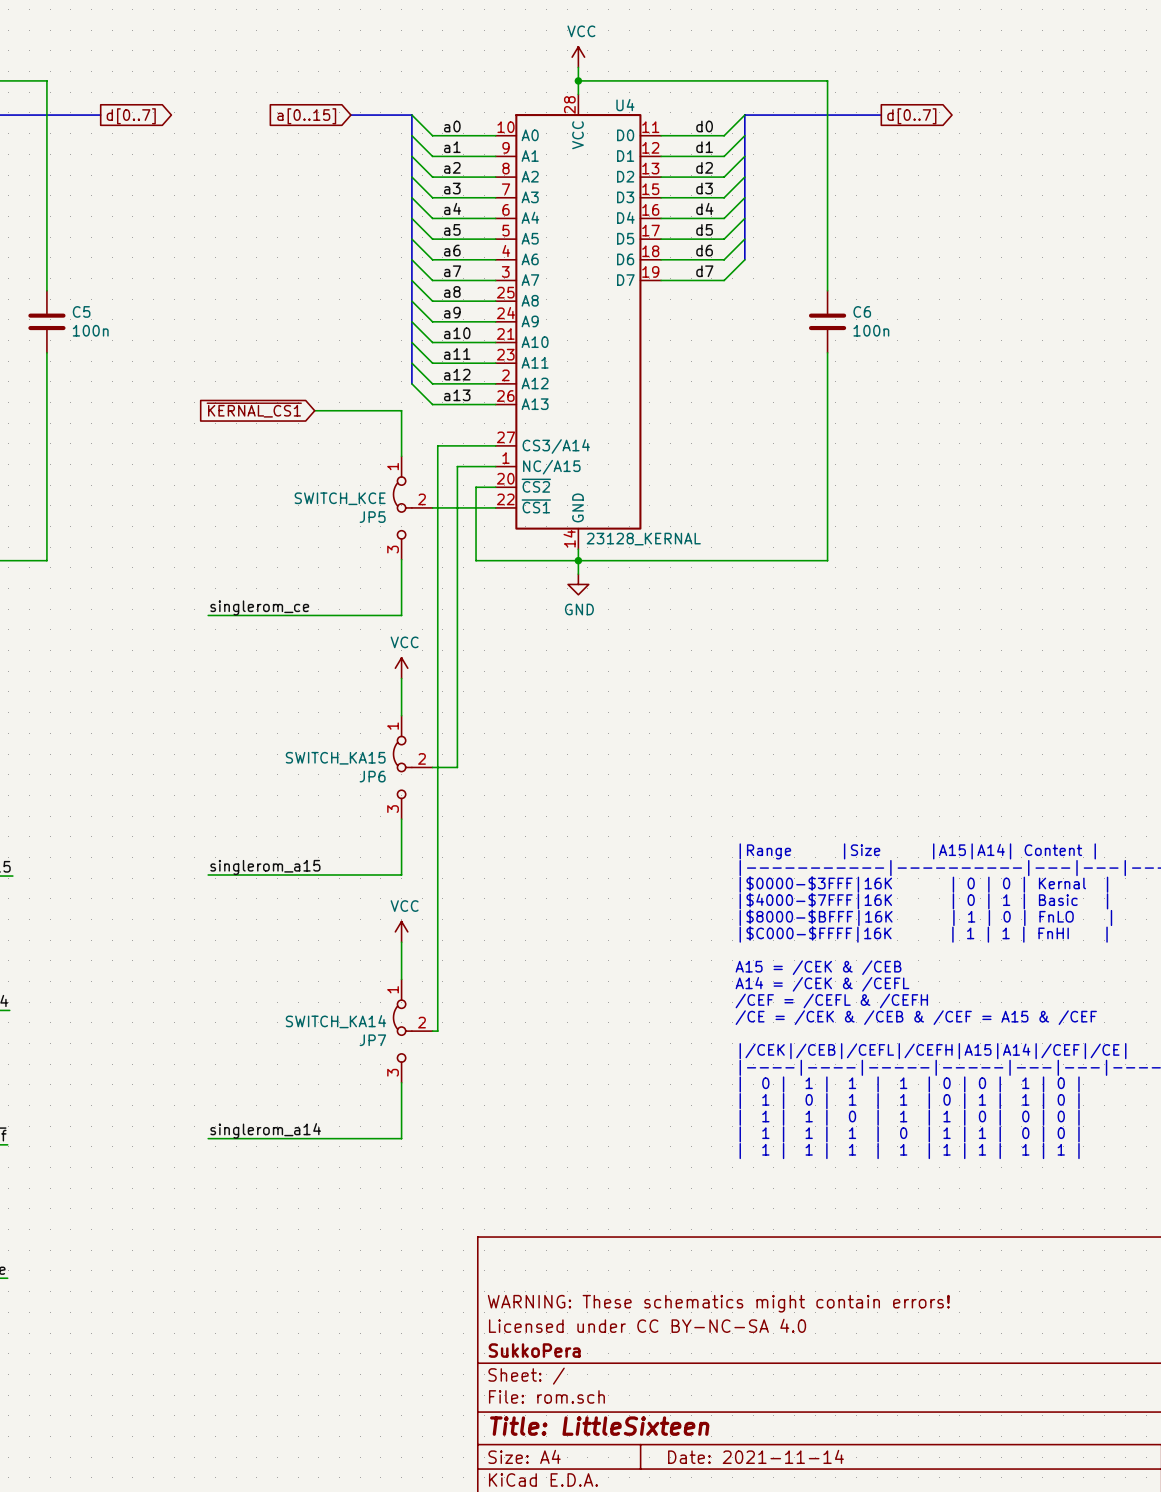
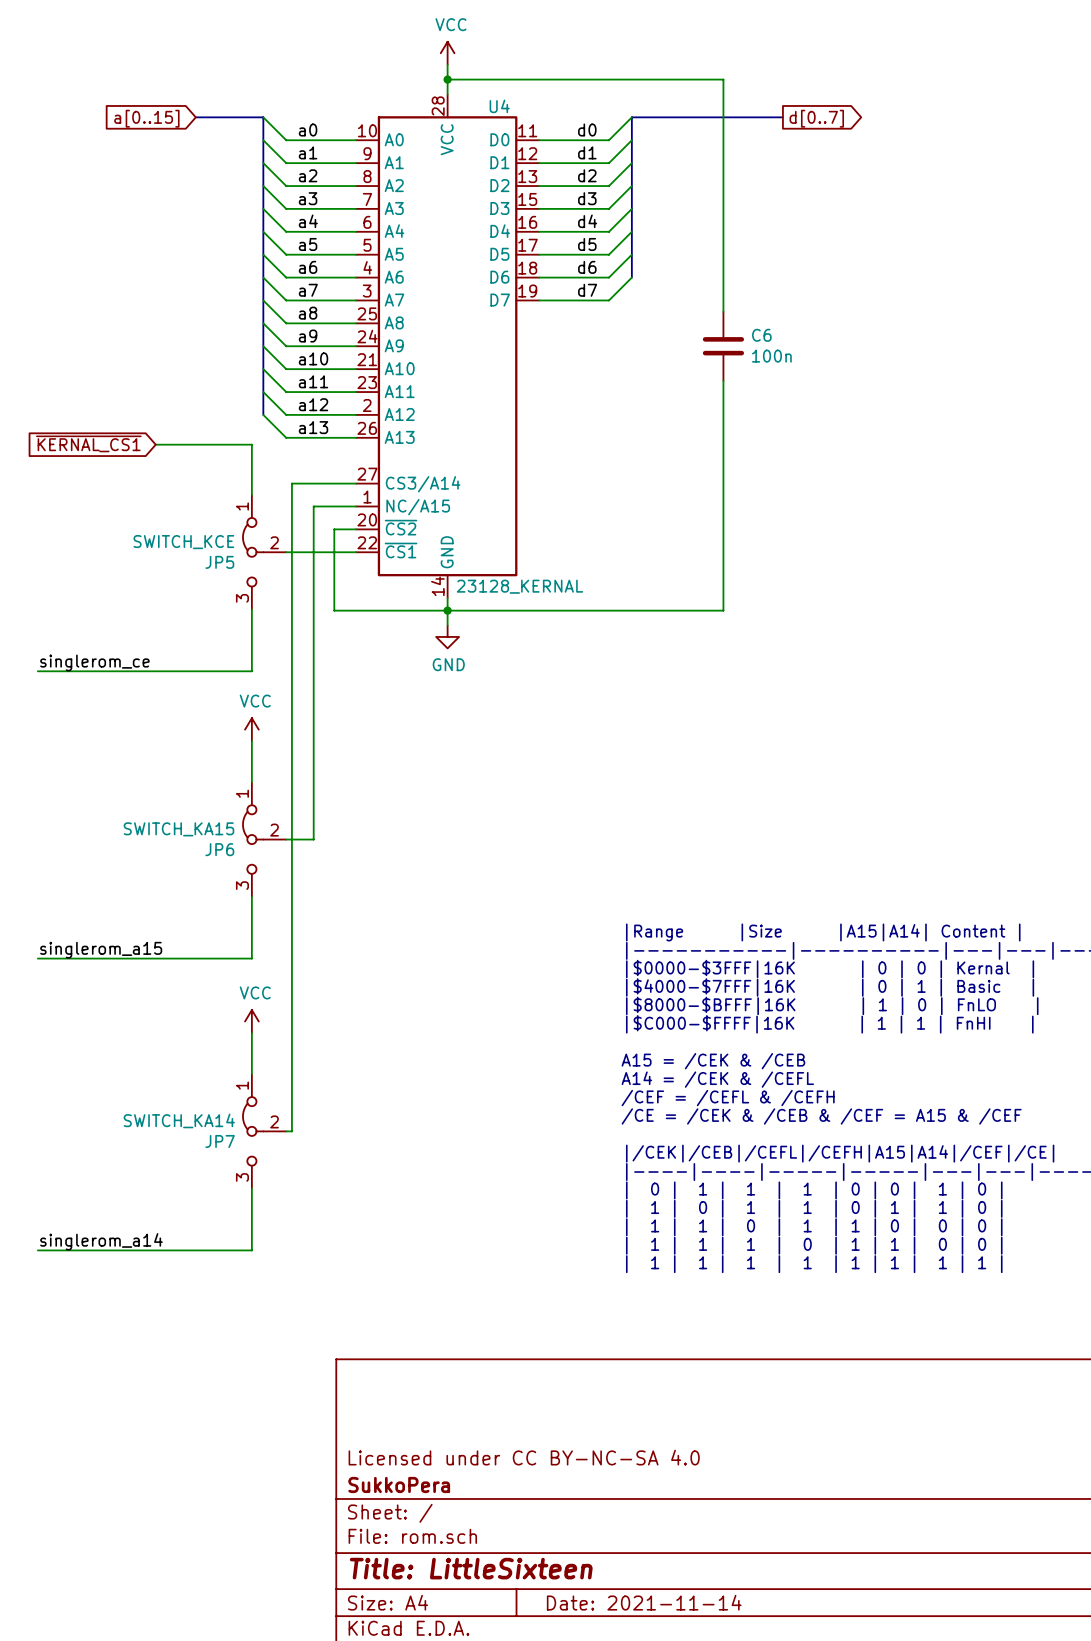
title block: WARNING: These schematics might contain errors! (718, 1303) -> none

